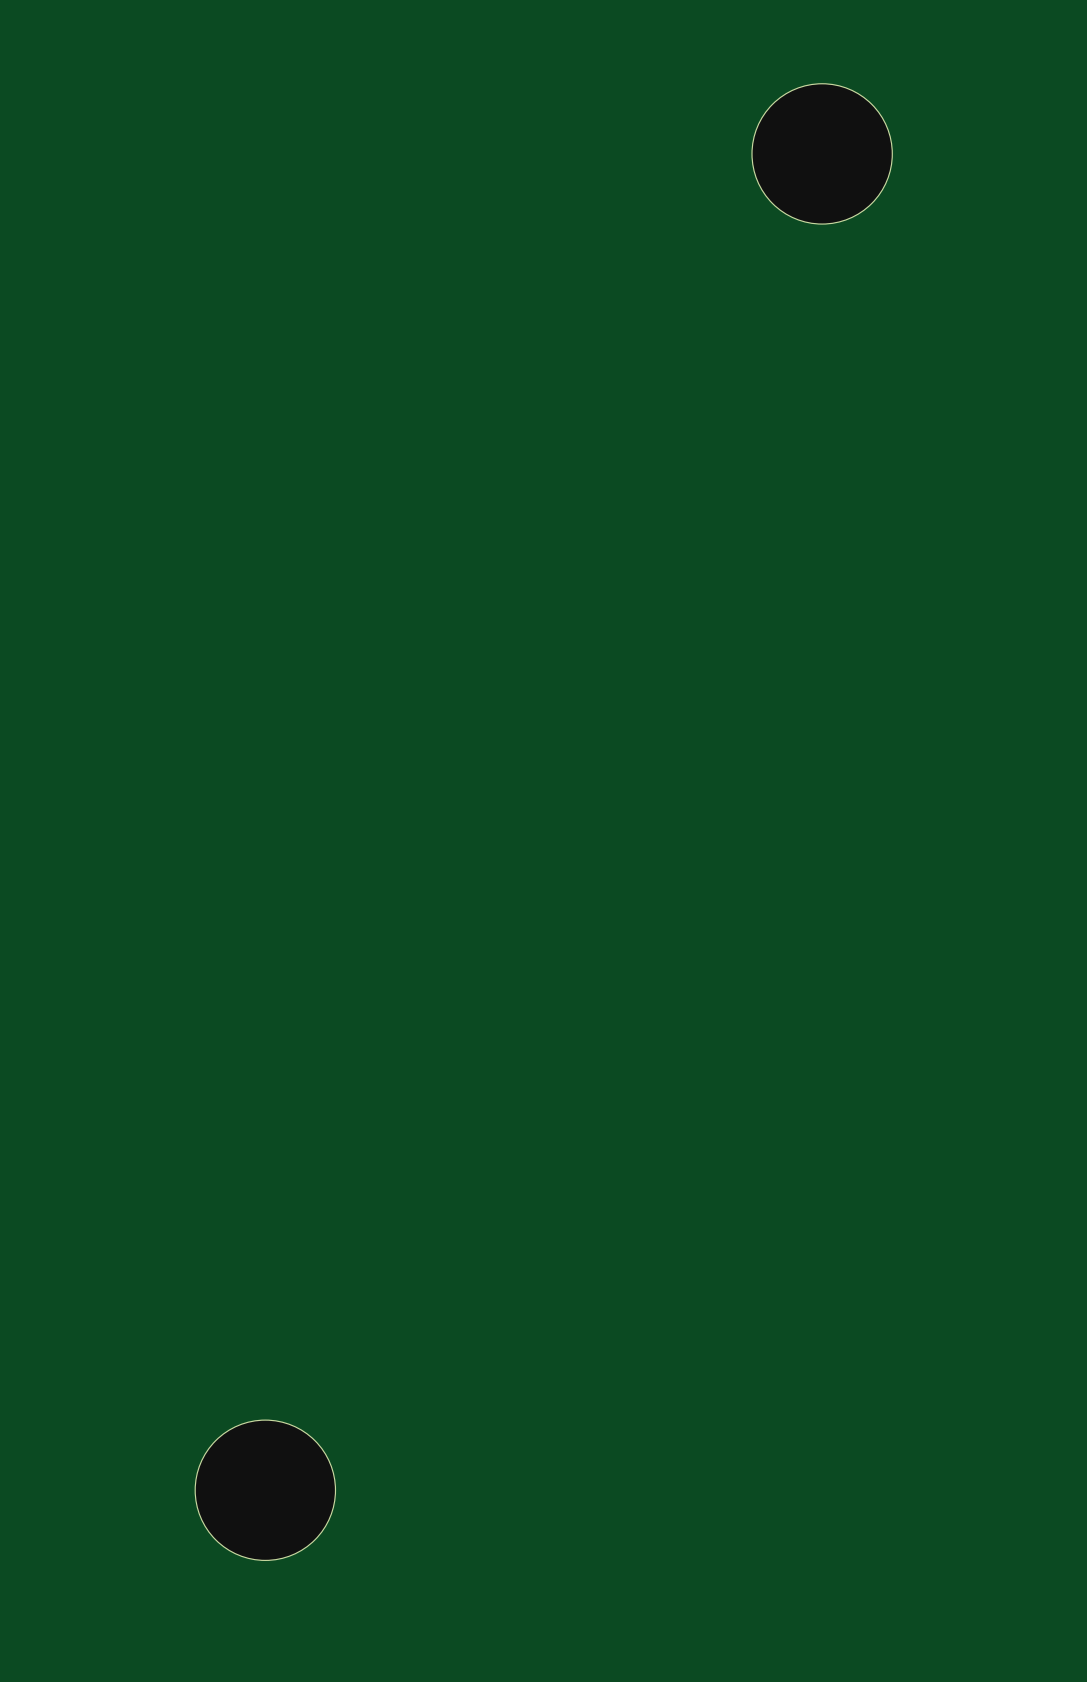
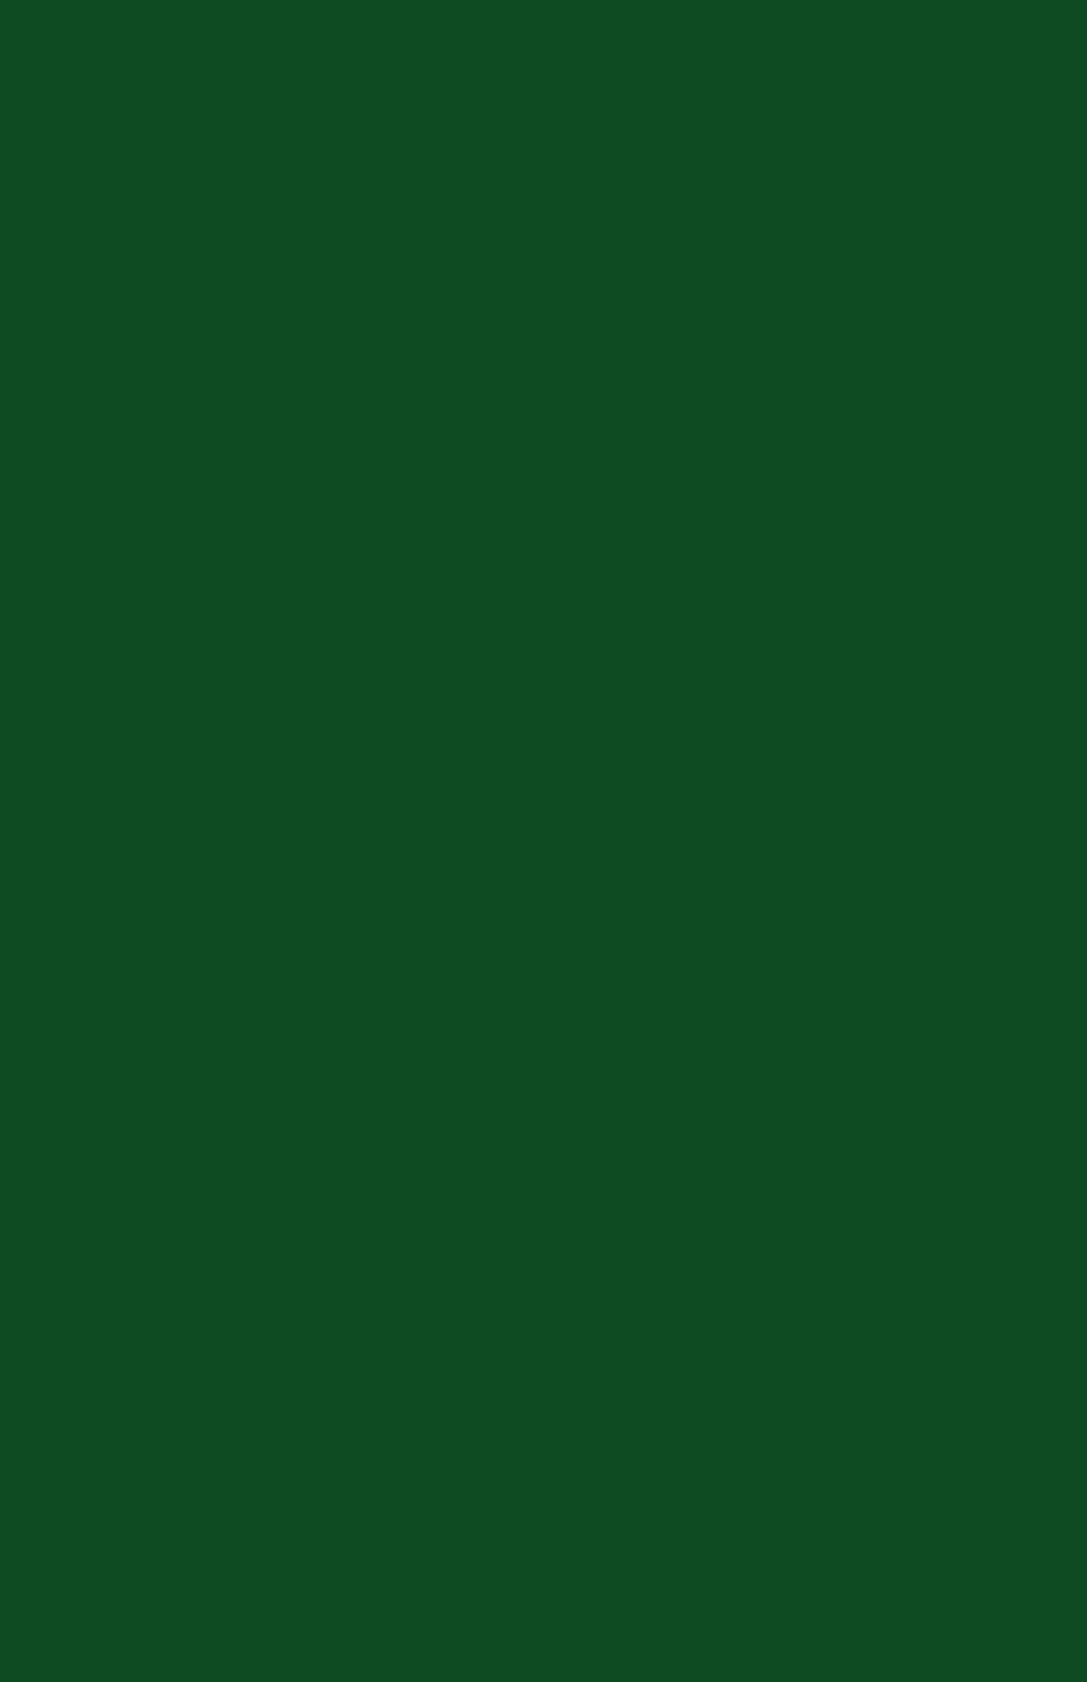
part: (822, 153) -> none
part: (265, 1490) -> none

